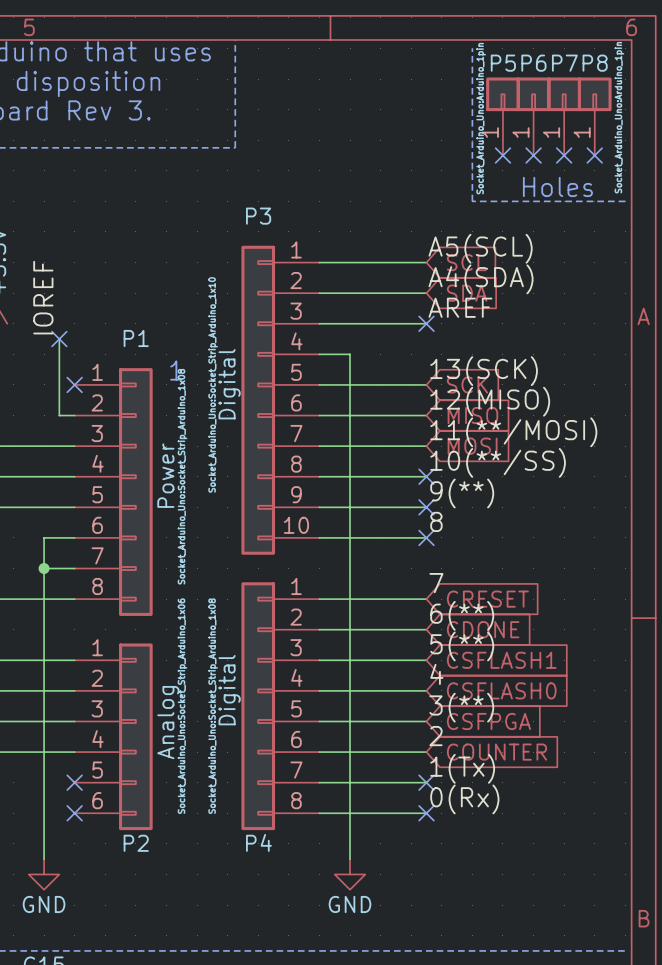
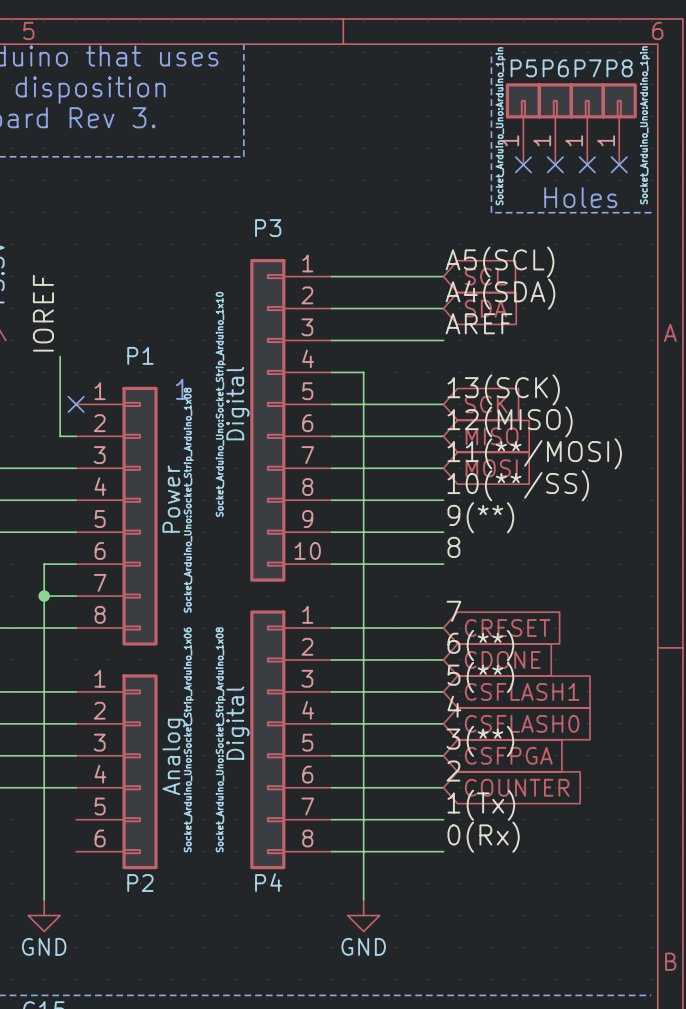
no-connect mark: (426, 323) -> none
no-connect mark: (59, 339) -> none
no-connect mark: (426, 476) -> none
no-connect mark: (426, 507) -> none
no-connect mark: (426, 537) -> none
no-connect mark: (74, 782) -> none
no-connect mark: (426, 782) -> none
no-connect mark: (74, 813) -> none
no-connect mark: (426, 813) -> none

